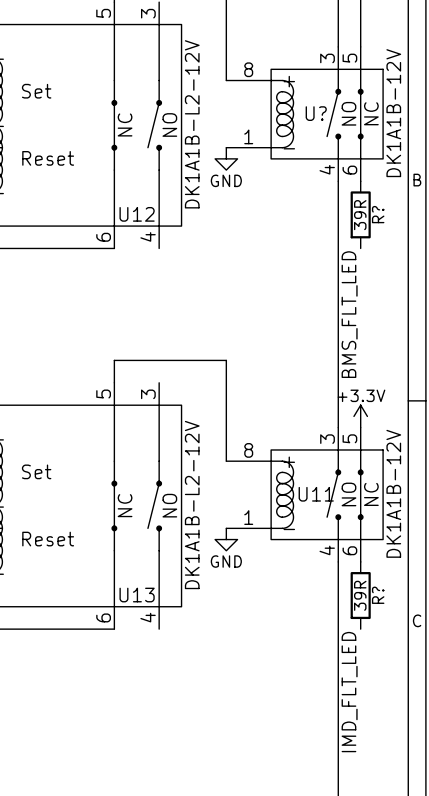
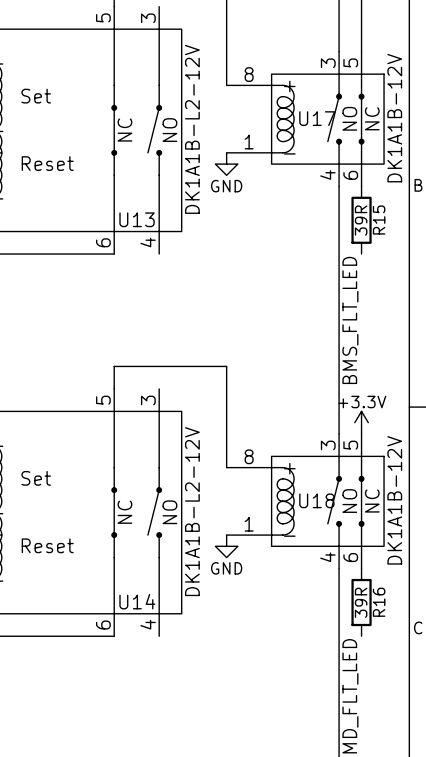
U? name: U? (316, 113) -> U17 (317, 118)
U12 name: U12 (137, 214) -> U13 (137, 219)
R? name: R? (378, 214) -> R15 (379, 220)
U11 name: U11 (316, 494) -> U18 (316, 500)
U13 name: U13 (137, 595) -> U14 (137, 601)
R? name: R? (378, 595) -> R16 (379, 602)

